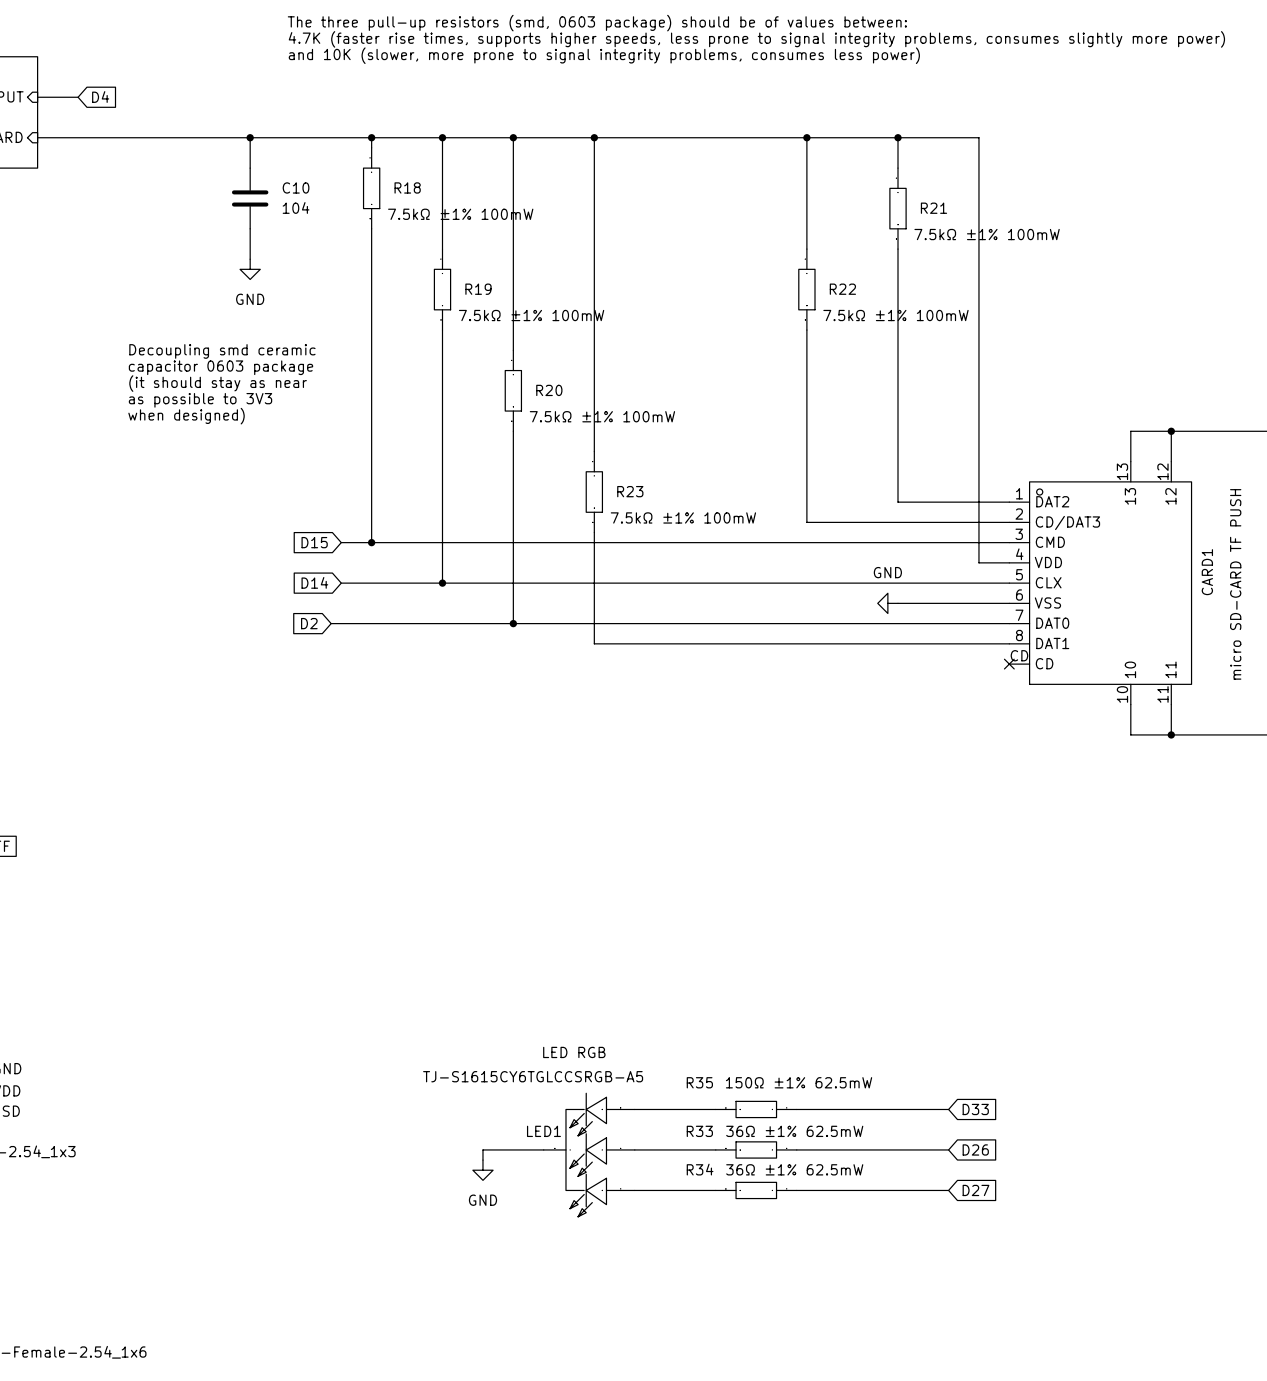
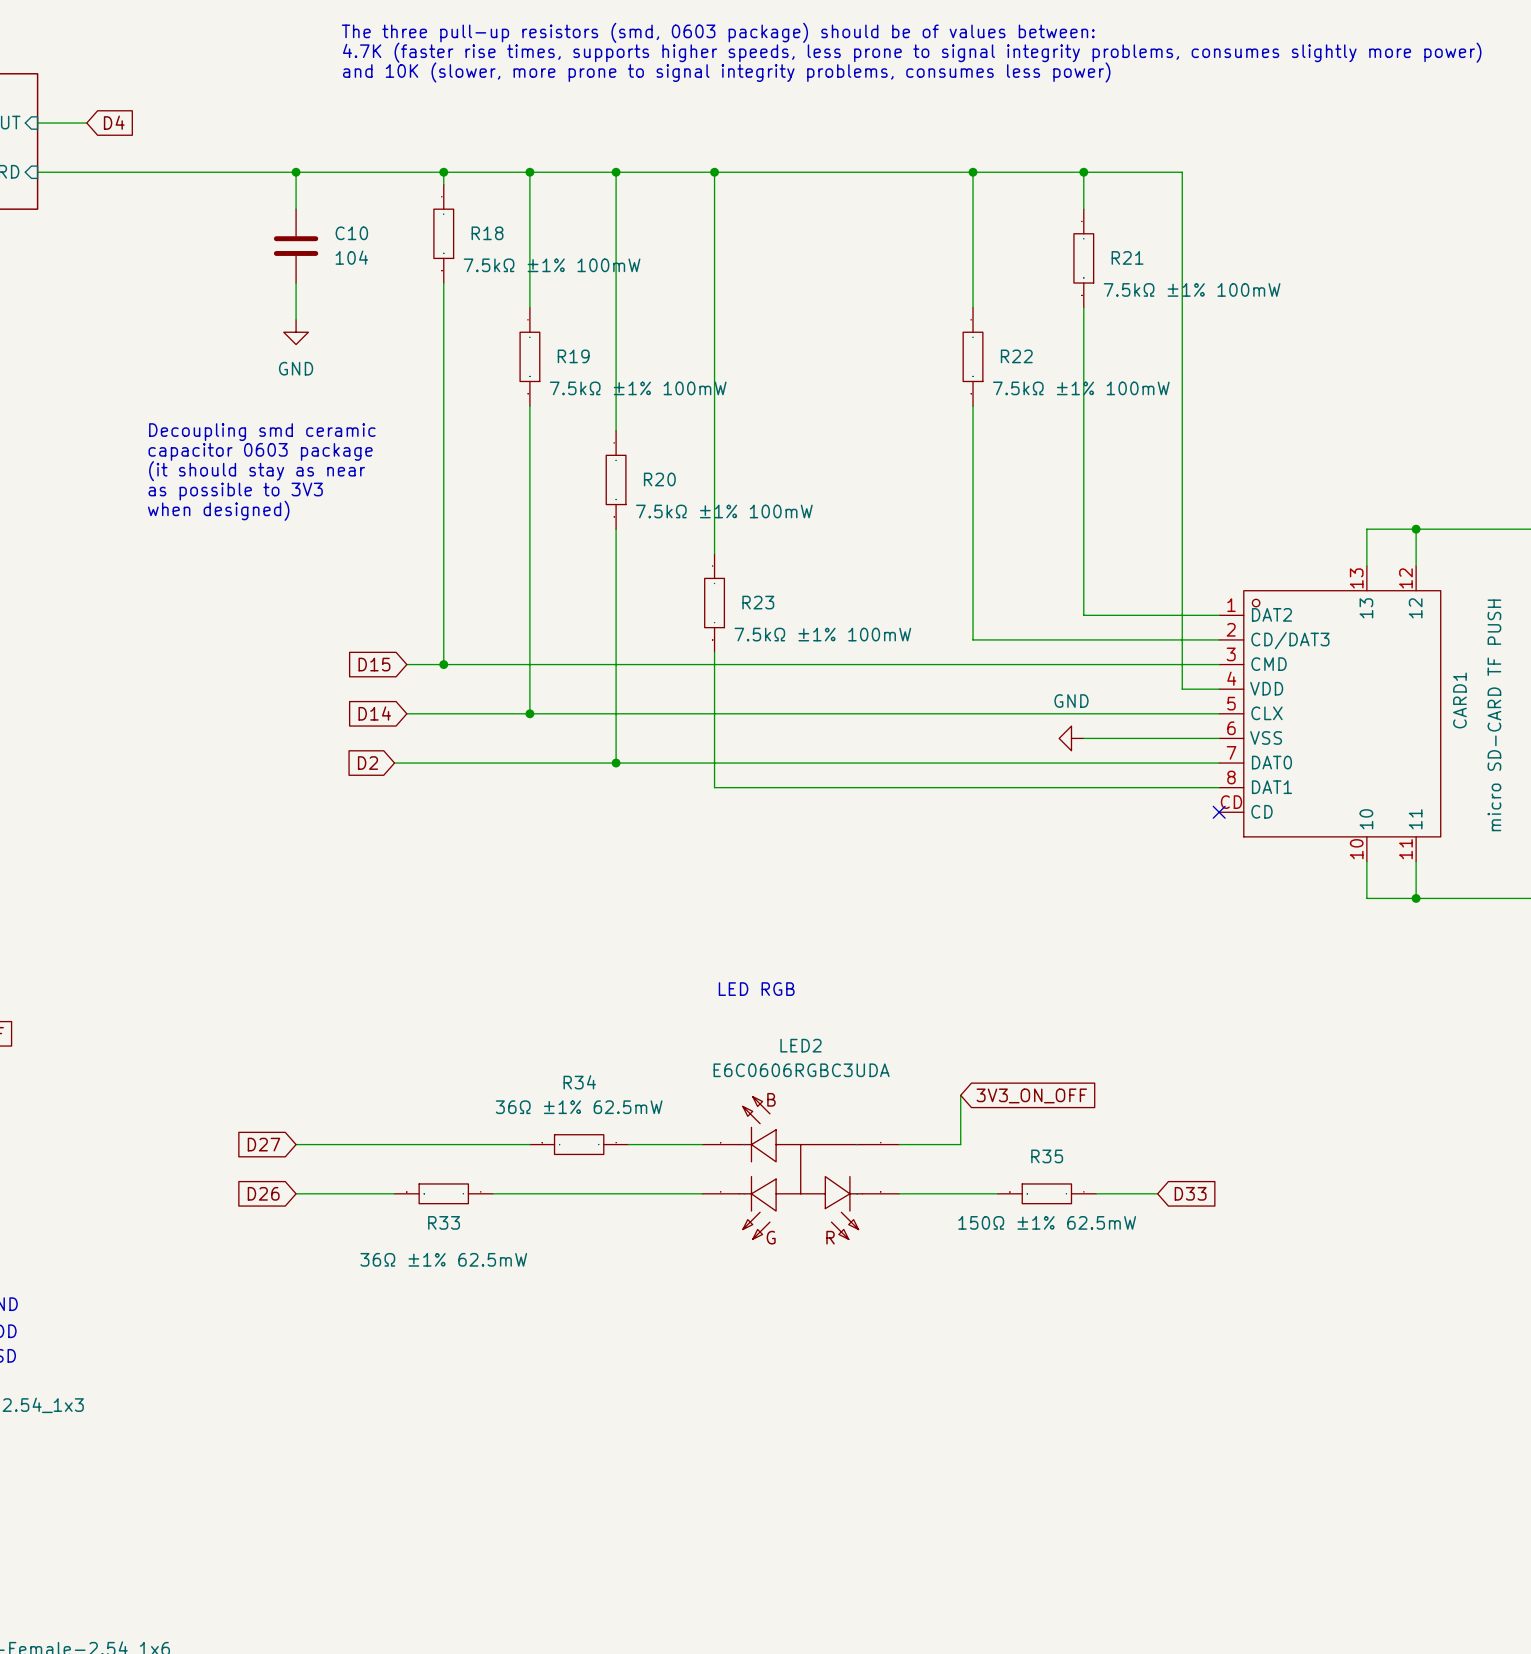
text: none -> LED RGB (756, 989)
wire: none -> (960, 1095) (960, 1144) (899, 1144)
global label: none -> 3V3_ON_OFF (1031, 1095)
global label: none -> D27 (263, 1144)
wire: none -> (296, 1144) (529, 1144)
wire: none -> (628, 1144) (702, 1144)
LED2: none -> E6C0606RGBC3UDA (800, 1167)
global label: none -> D26 (263, 1193)
wire: none -> (296, 1193) (394, 1193)
wire: none -> (493, 1193) (702, 1193)
wire: none -> (1096, 1193) (1157, 1193)
text: LED RGB (574, 1052) -> none
R35 name position: R35 (699, 1082) -> R35 (1047, 1156)
R35 value position: 150Ω ±1% 62.5mW (799, 1082) -> 150Ω ±1% 62.5mW (1047, 1222)
wire: (634, 1109) (715, 1109) -> (899, 1193) (997, 1193)
R35 position: (756, 1109) -> (1046, 1193)
wire: (796, 1109) (948, 1109) -> none
global label position: D33 (975, 1109) -> D33 (1190, 1193)
R33 name position: R33 (699, 1131) -> R33 (444, 1222)
R33 value position: 36Ω ±1% 62.5mW (794, 1131) -> 36Ω ±1% 62.5mW (443, 1259)
wire: (543, 1149) (482, 1149) (482, 1160) -> none
wire: (634, 1149) (715, 1149) -> none
R33 position: (756, 1149) -> (443, 1193)
wire: (796, 1149) (948, 1149) -> none
global label: D26 (975, 1149) -> none
LED1: TJ-S1615CY6TGLCCSRGB-A5 (589, 1155) -> none
R34 name position: R34 (700, 1169) -> R34 (579, 1082)
R34 value position: 36Ω ±1% 62.5mW (794, 1169) -> 36Ω ±1% 62.5mW (579, 1107)
power symbol: GND (482, 1170) -> none
wire: (634, 1190) (715, 1190) -> none
R34 position: (756, 1190) -> (579, 1144)
wire: (796, 1190) (948, 1190) -> none
global label: D27 (975, 1190) -> none

